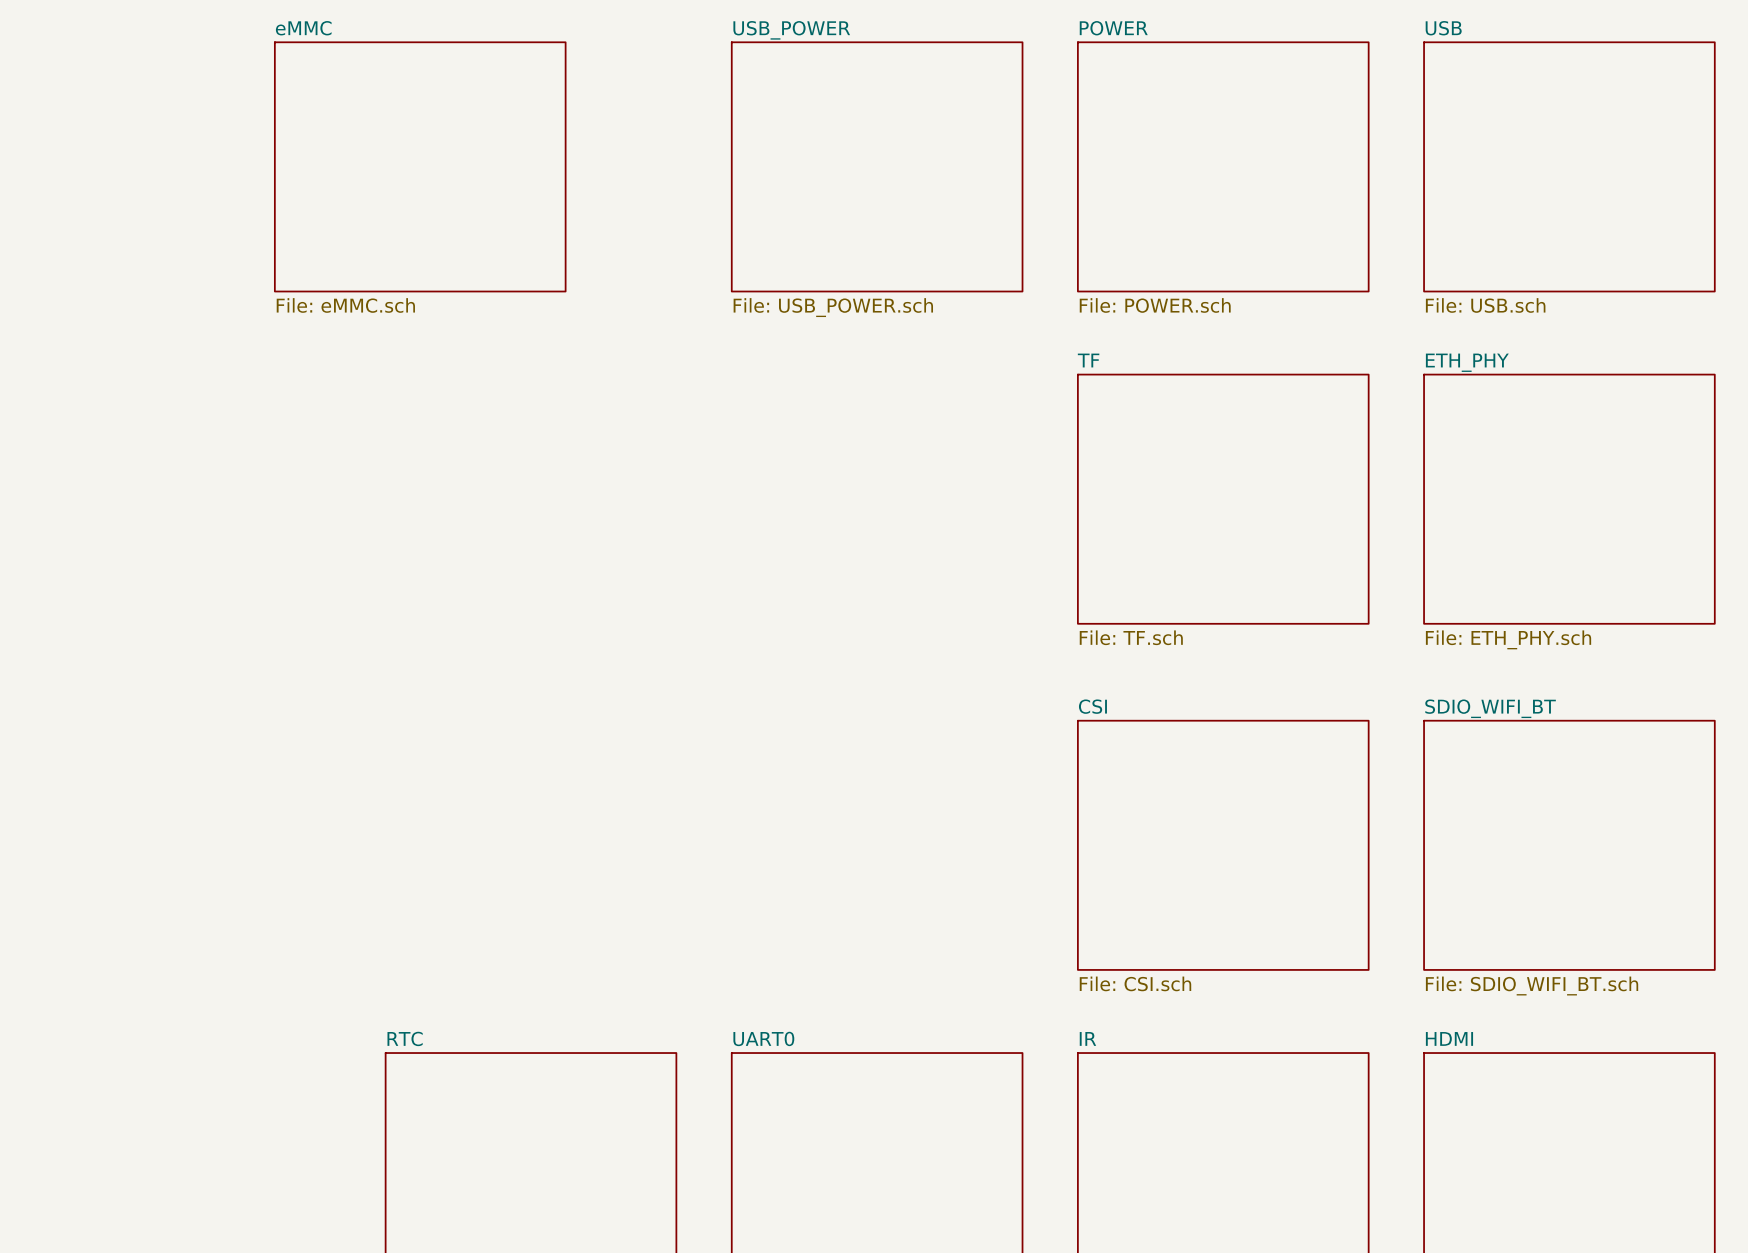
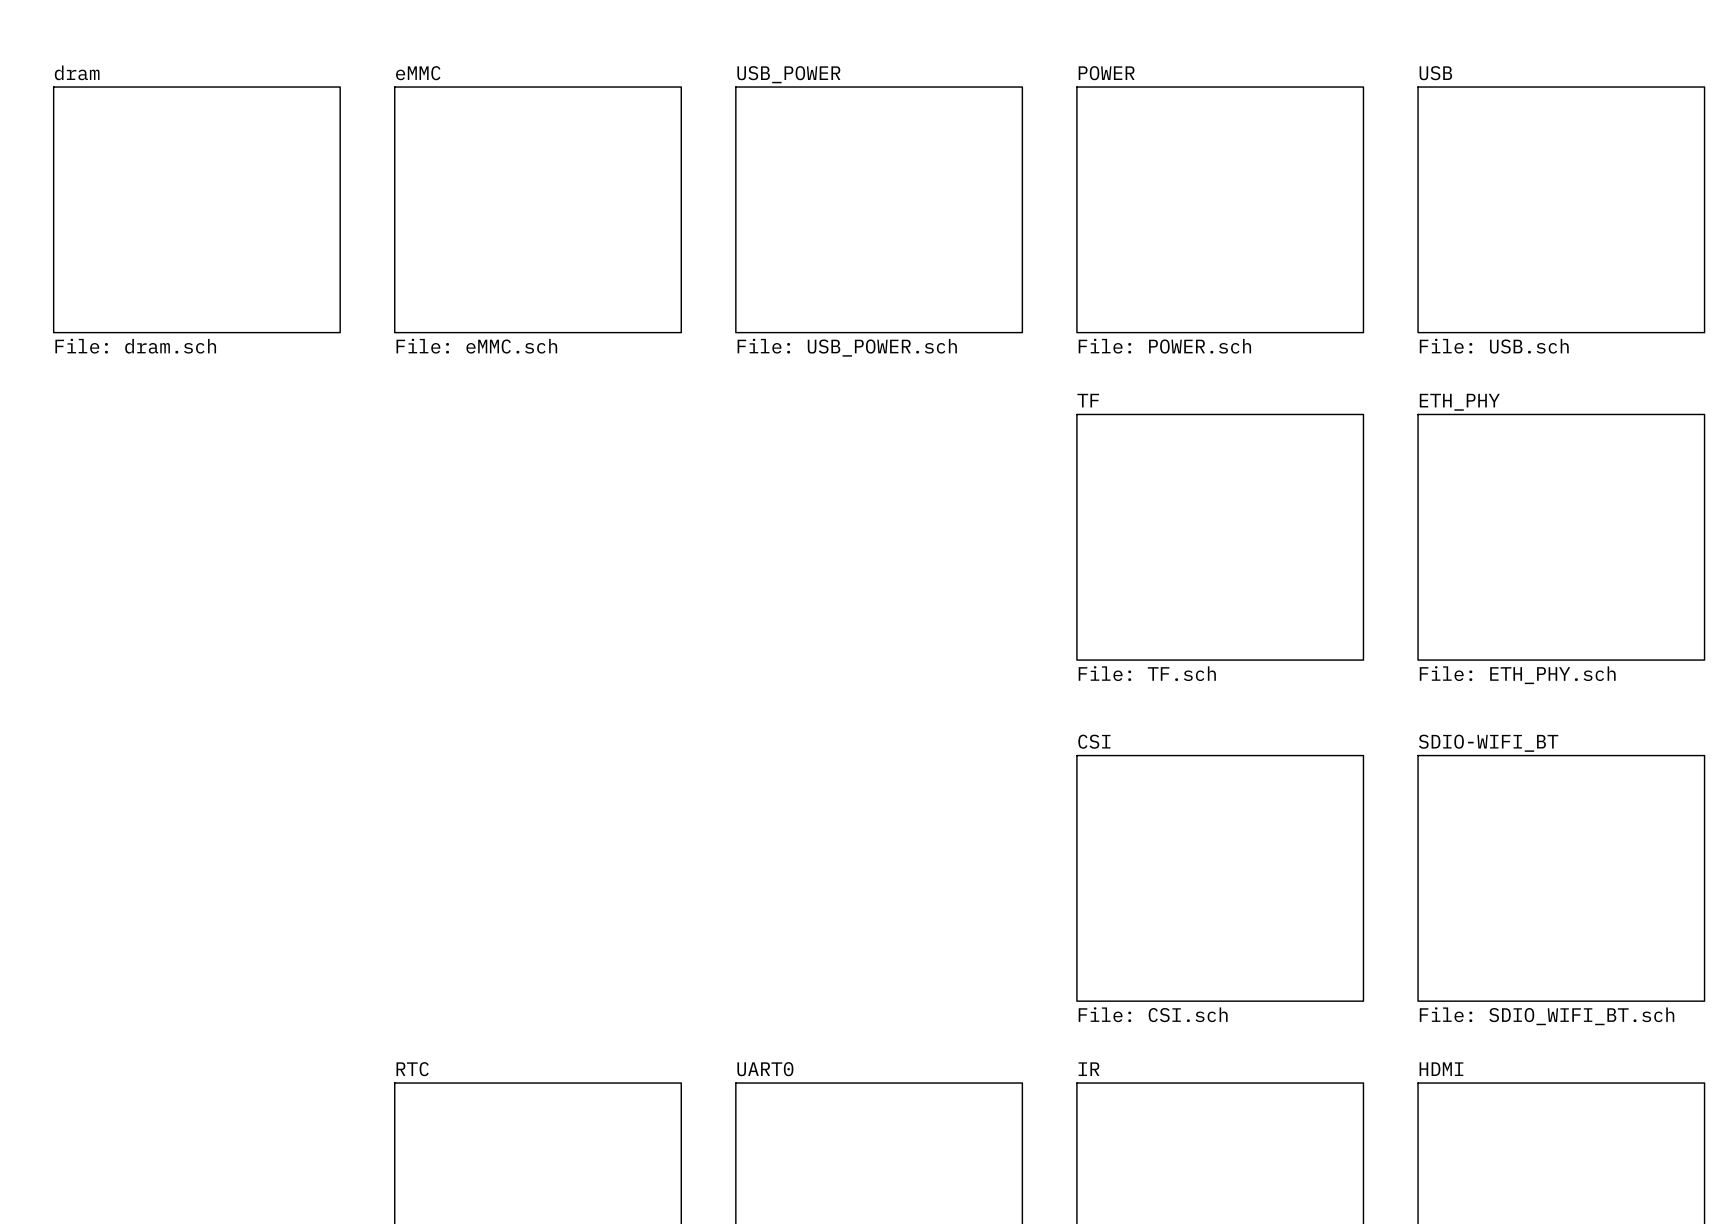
sheet dram: none -> File: dram.sch (196, 209)
sheet eMMC position: (420, 166) -> (538, 209)
sheet SDIO_WIFI_BT name: SDIO_WIFI_BT (1490, 708) -> SDIO-WIFI_BT (1488, 743)

